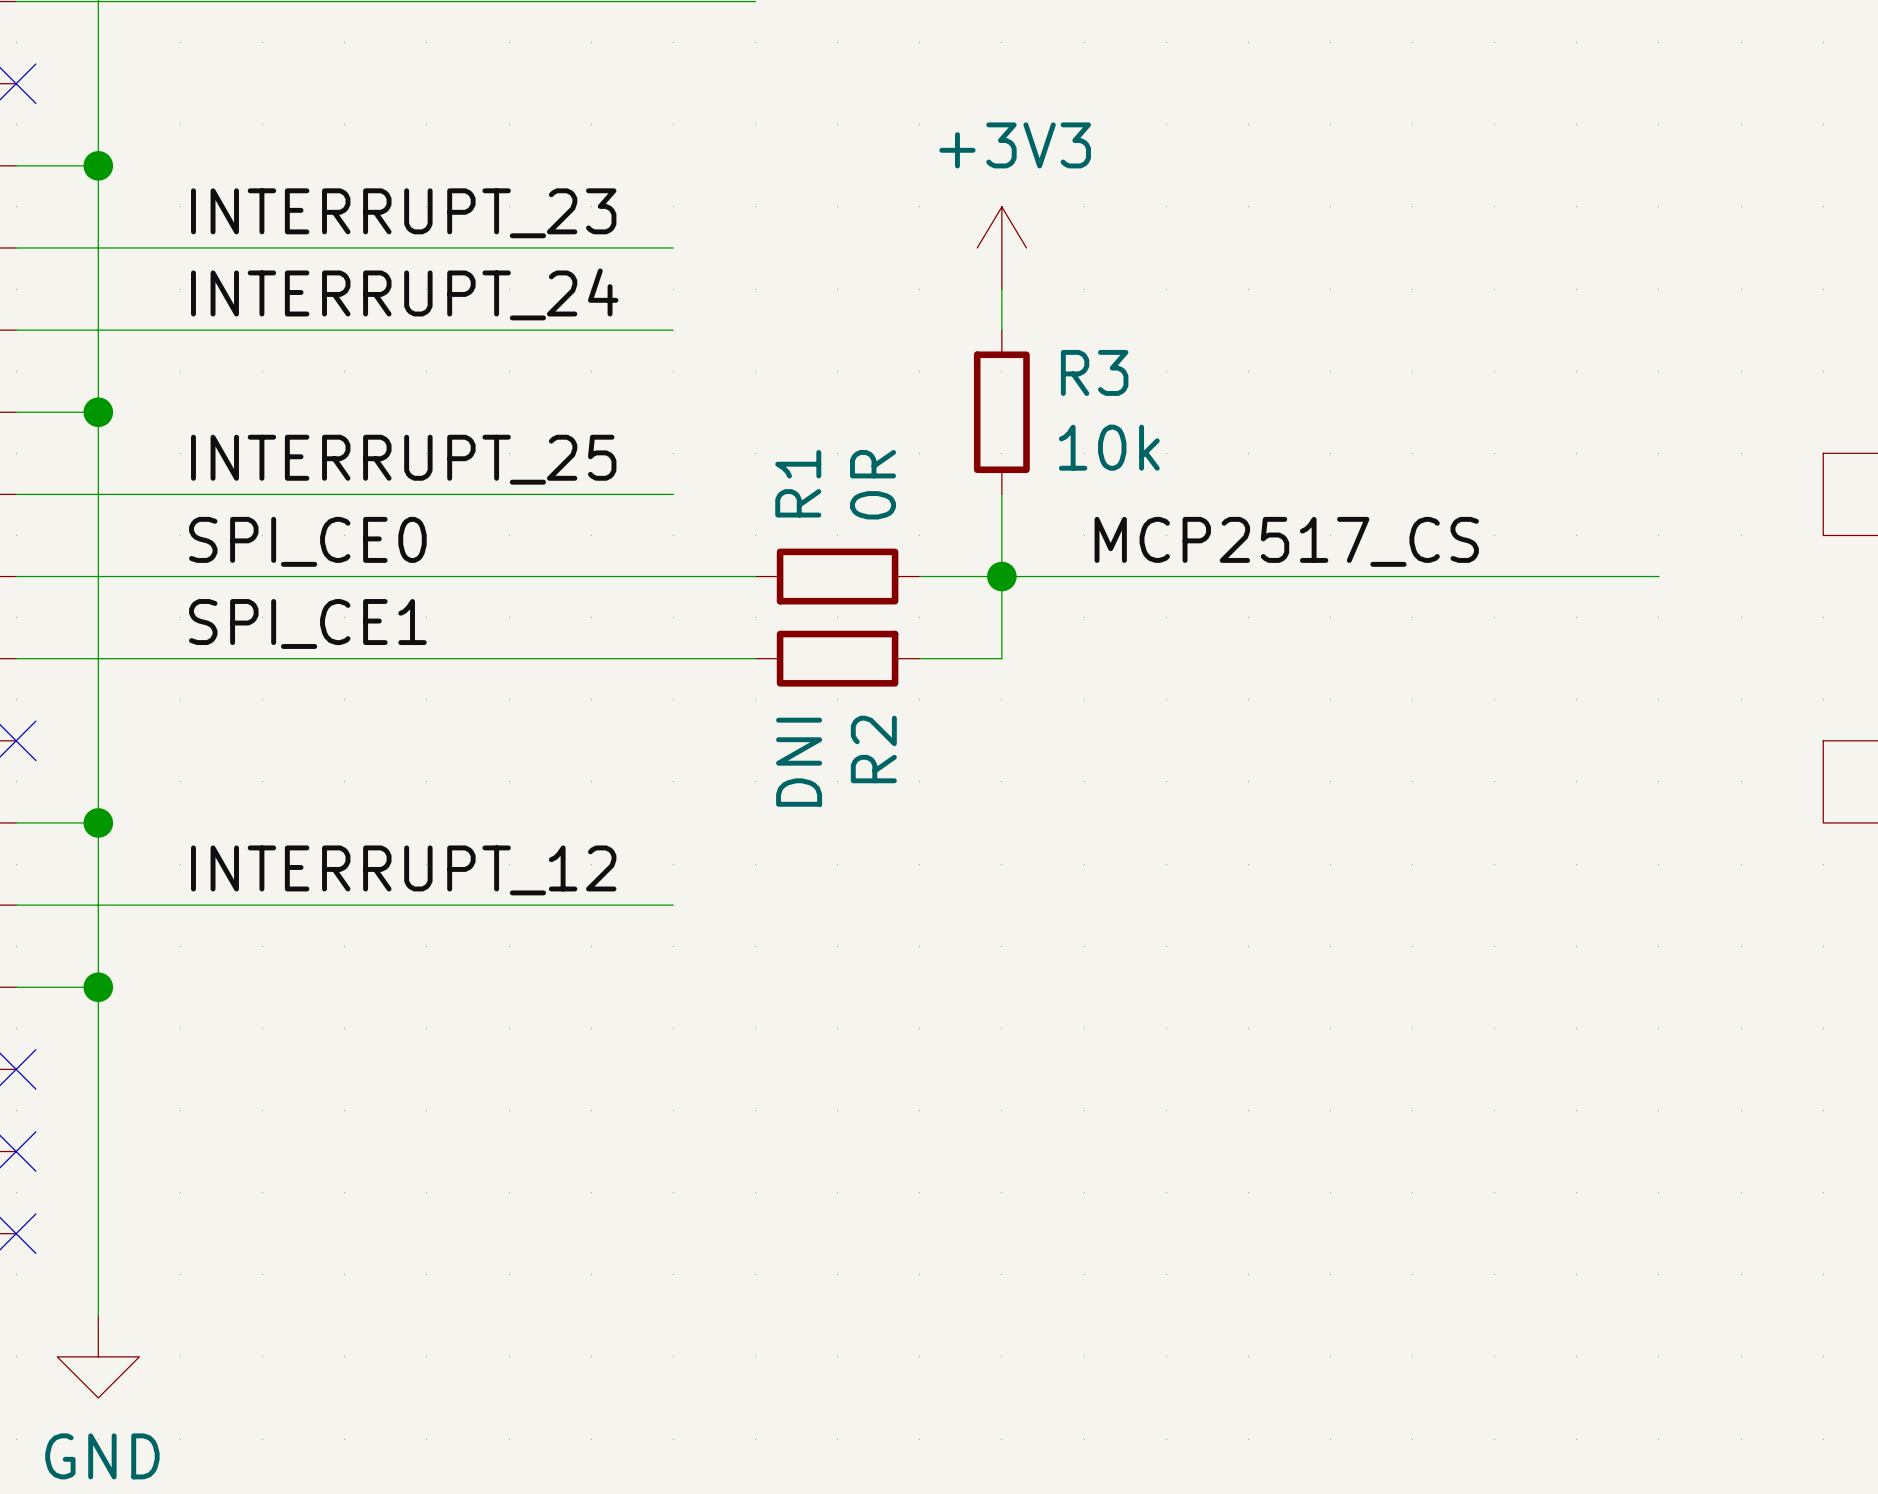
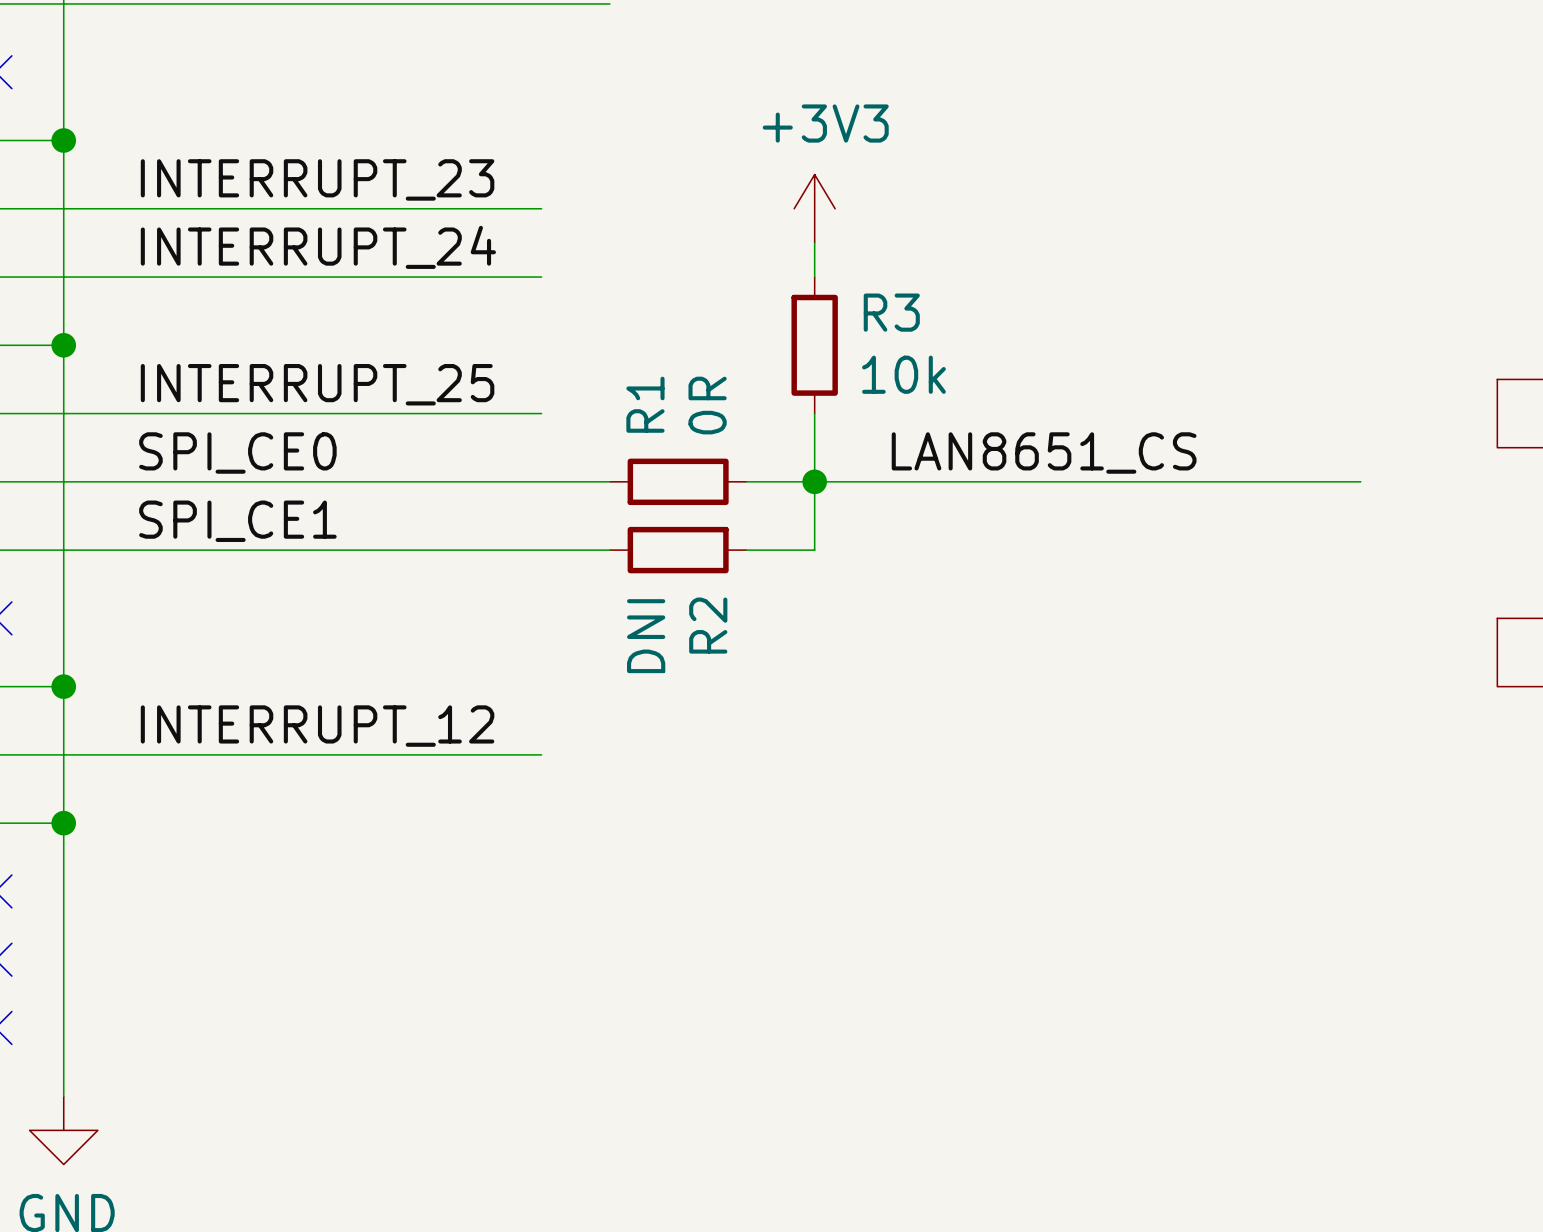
label: MCP2517_CS (1286, 541) -> LAN8651_CS (1044, 453)

